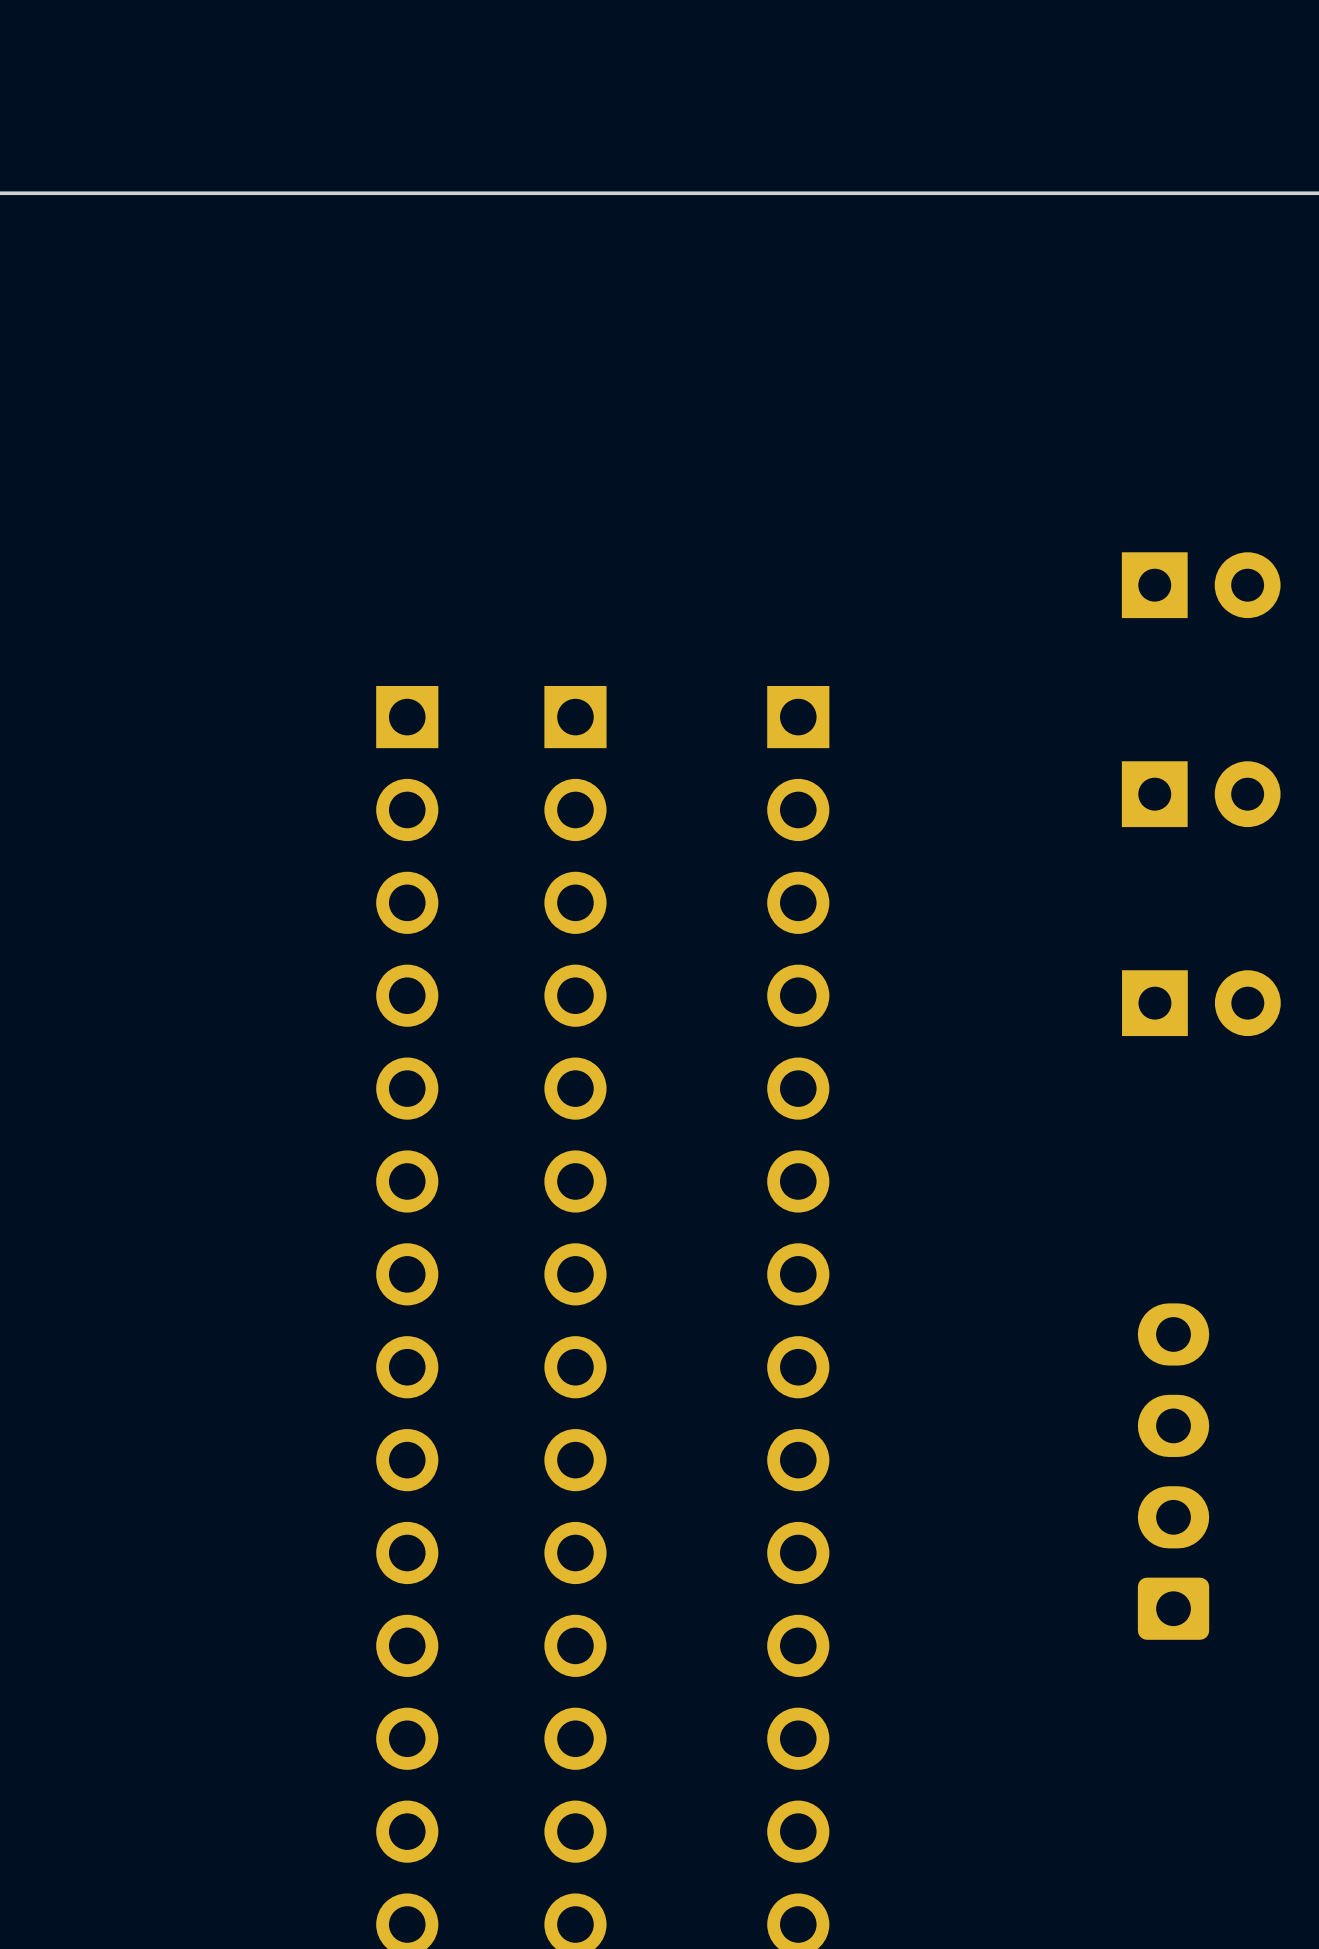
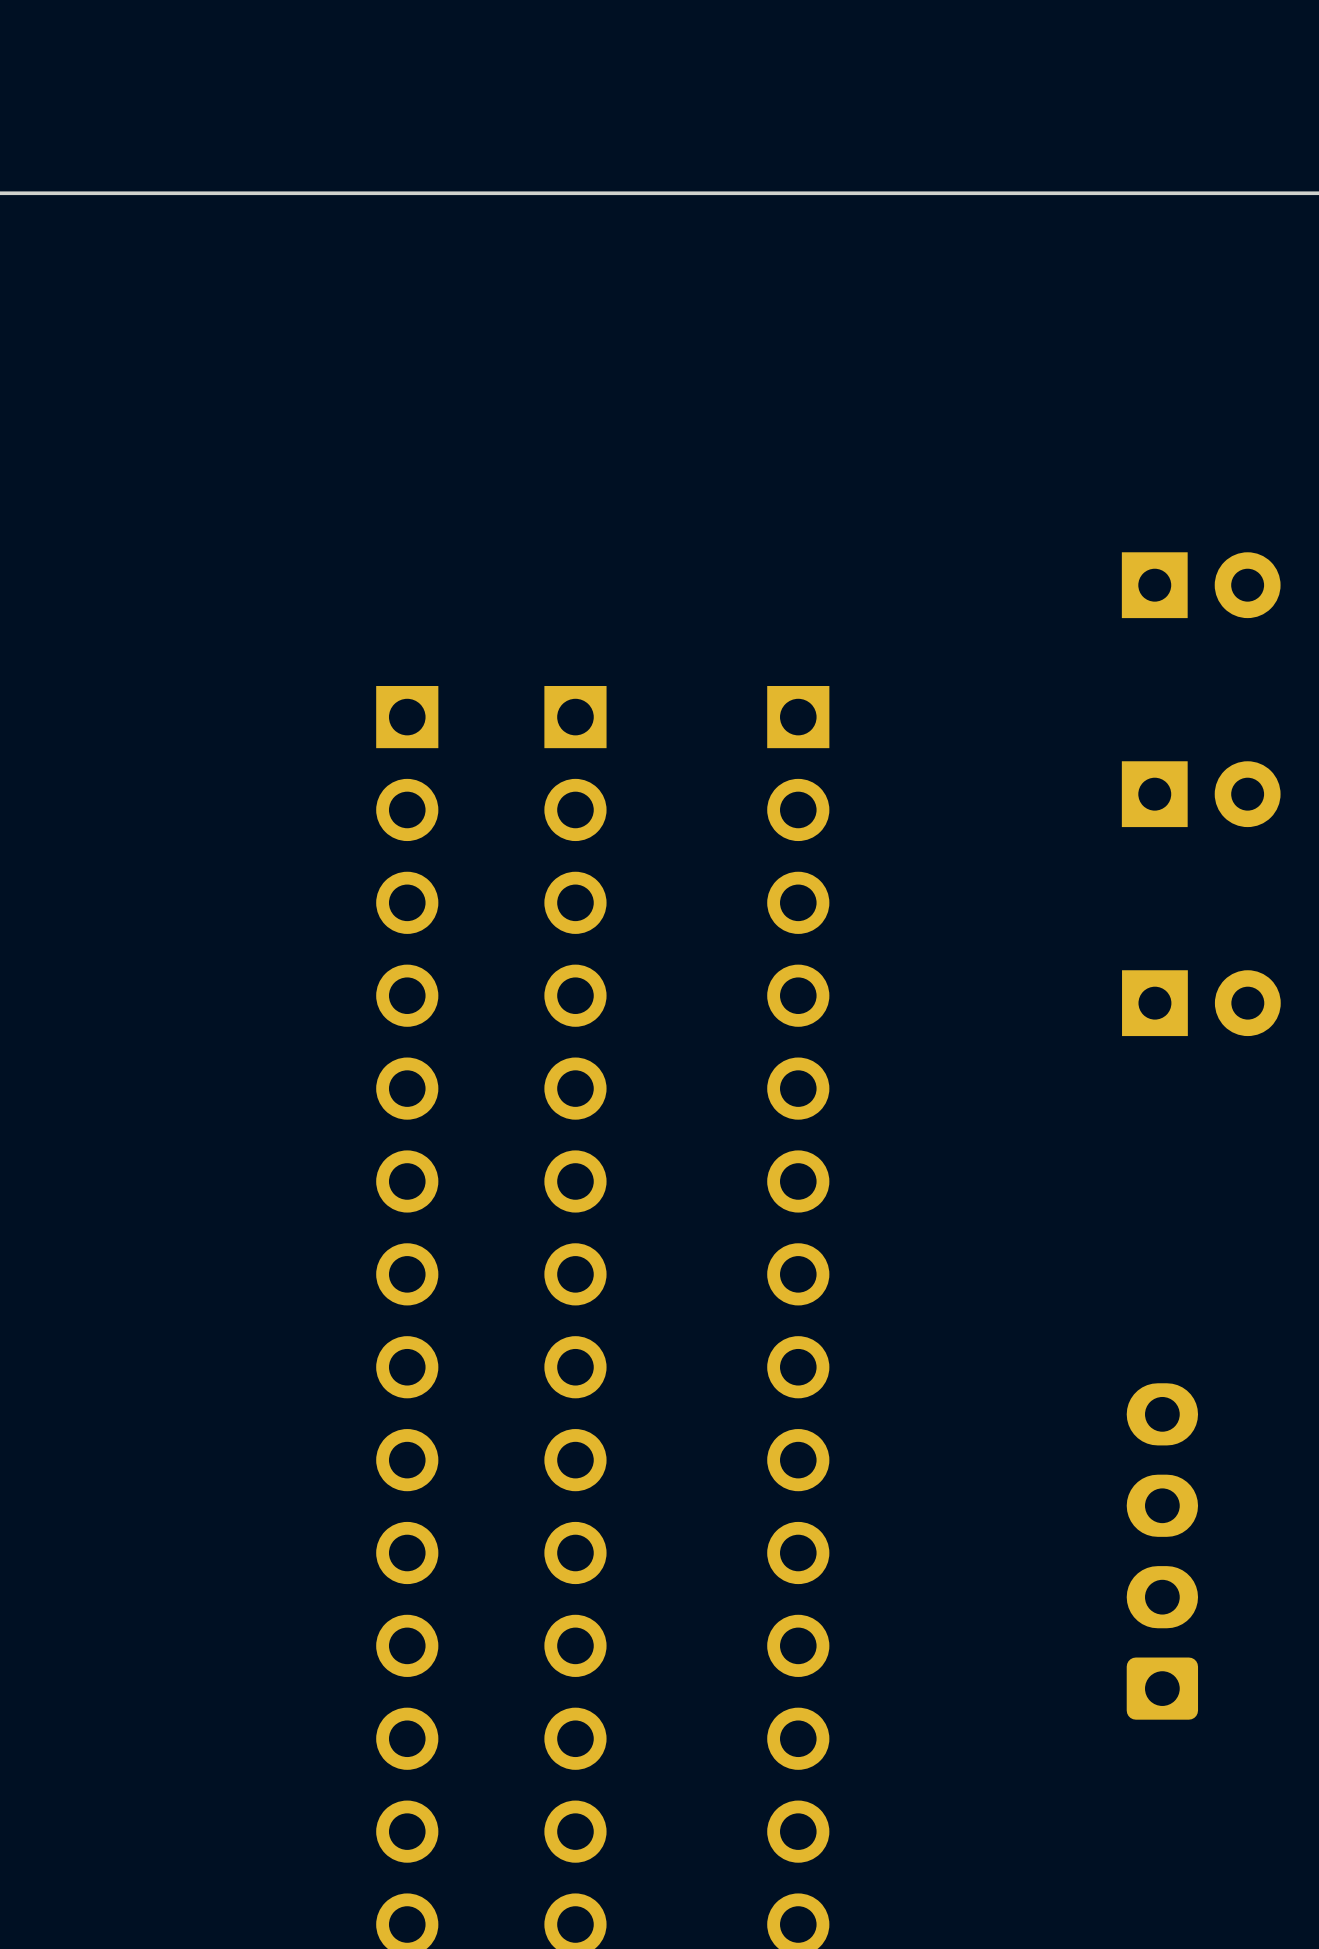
part position: (1173, 1471) -> (1162, 1551)

